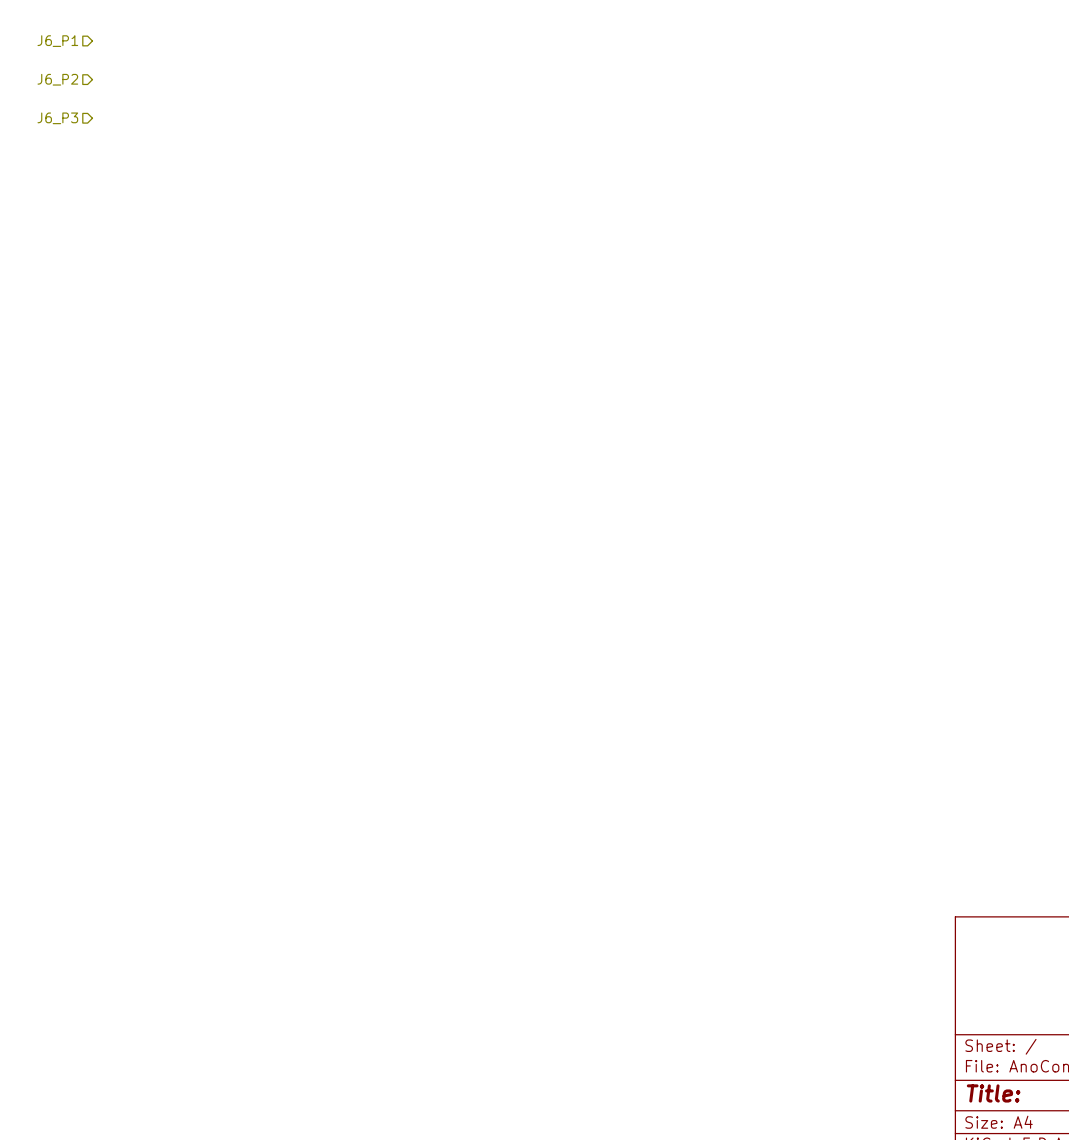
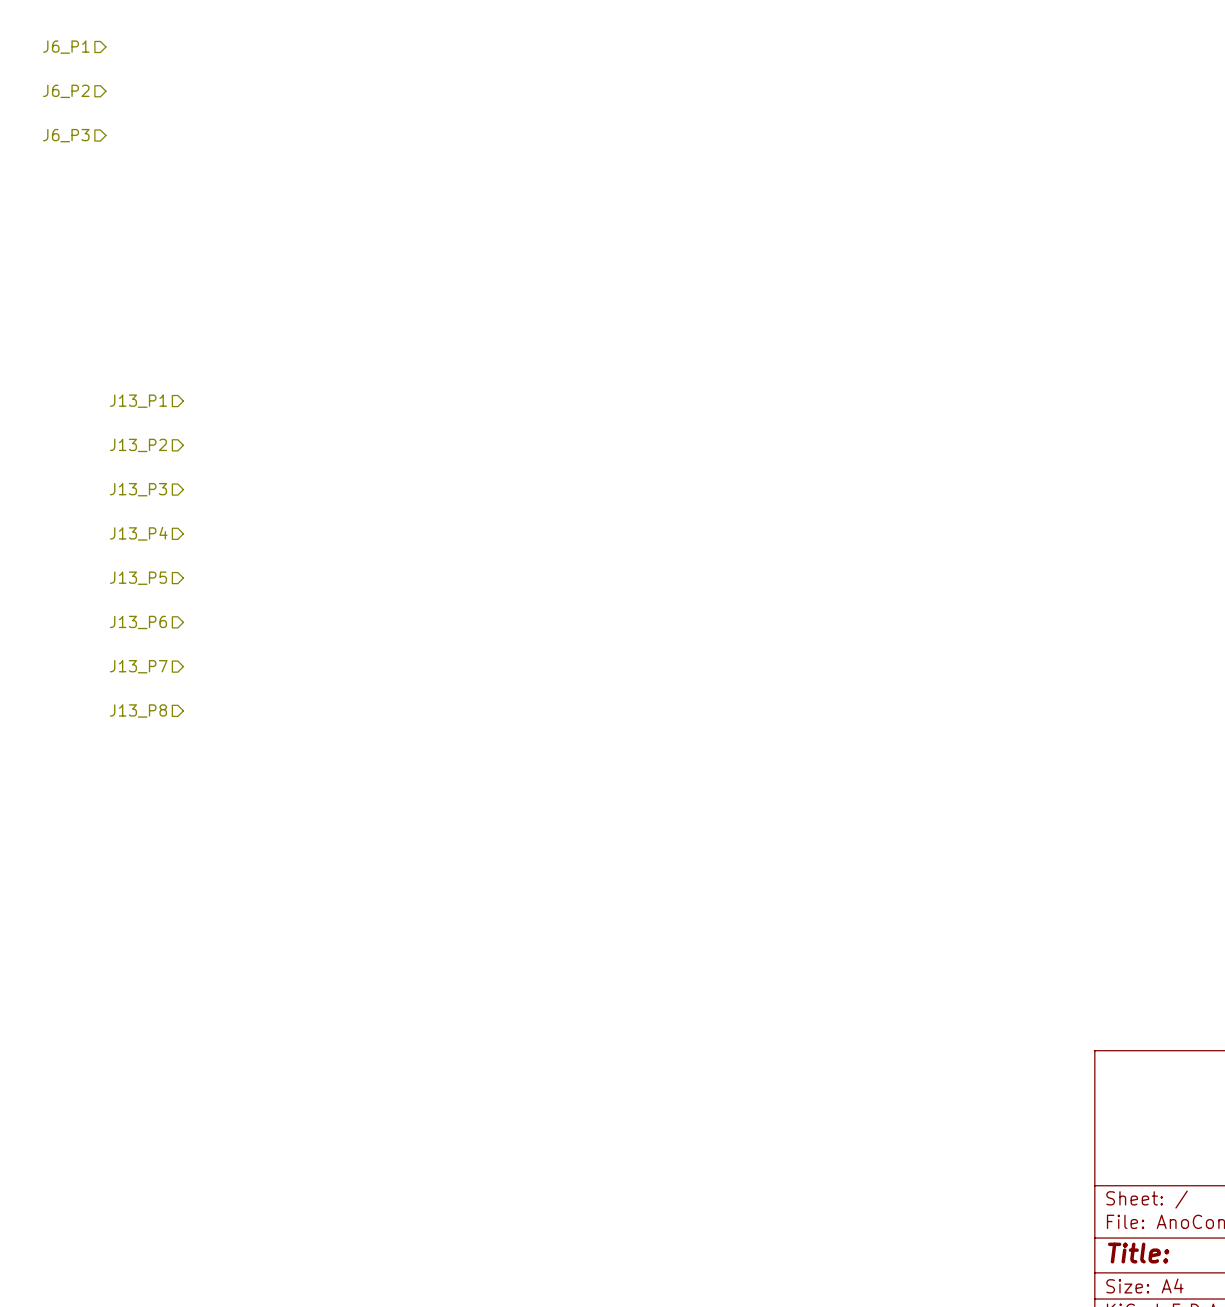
hierarchical label: none -> J13_P1 (138, 401)
hierarchical label: none -> J13_P2 (138, 445)
hierarchical label: none -> J13_P3 (138, 489)
hierarchical label: none -> J13_P4 (138, 533)
hierarchical label: none -> J13_P5 (138, 578)
hierarchical label: none -> J13_P6 (138, 622)
hierarchical label: none -> J13_P7 (138, 666)
hierarchical label: none -> J13_P8 (138, 710)

